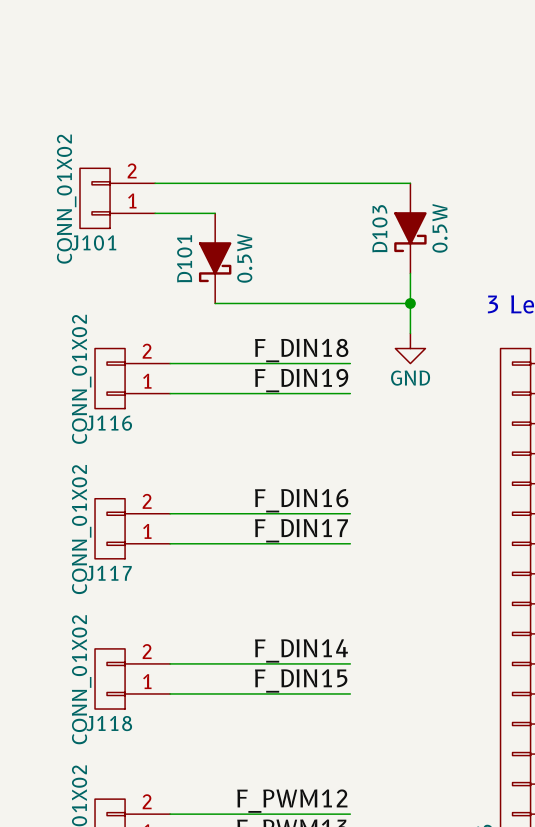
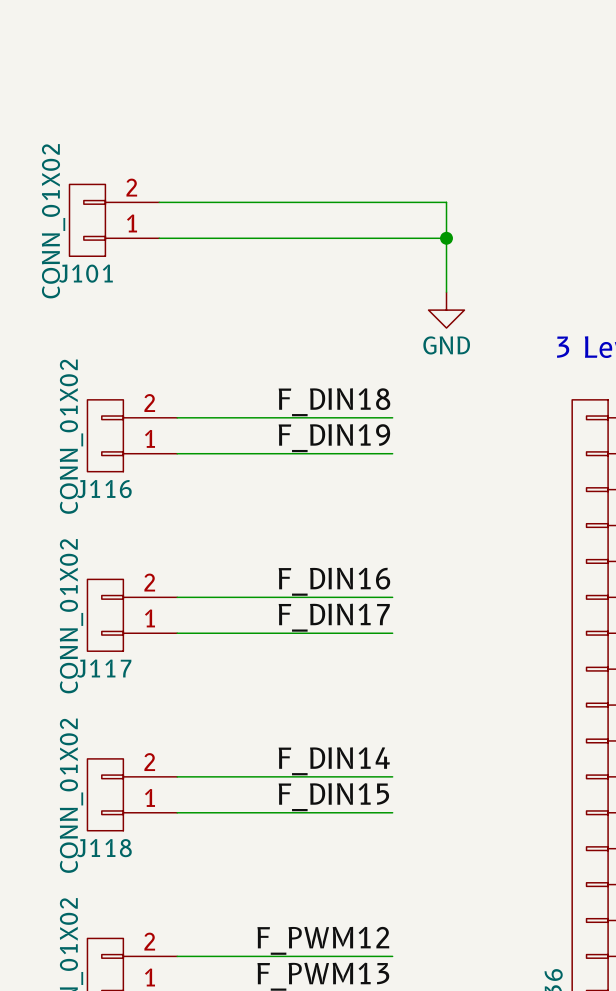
wire: (395, 183) (410, 183) -> (446, 202) (446, 292)
wire: none -> (231, 238) (446, 238)
junction: none -> (446, 238)
D103: 0.5W (410, 228) -> none
D101: 0.5W (215, 258) -> none
wire: (410, 273) (410, 333) -> none
wire: (215, 303) (410, 303) -> none
junction: (410, 303) -> none
power symbol position: GND (410, 348) -> GND (446, 310)

